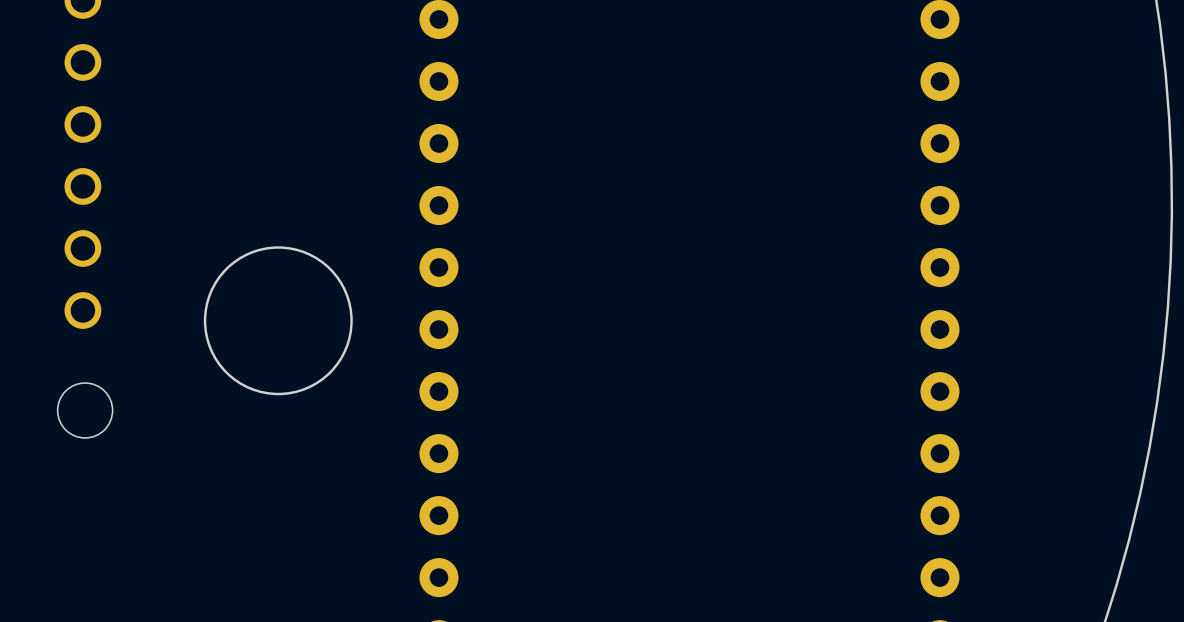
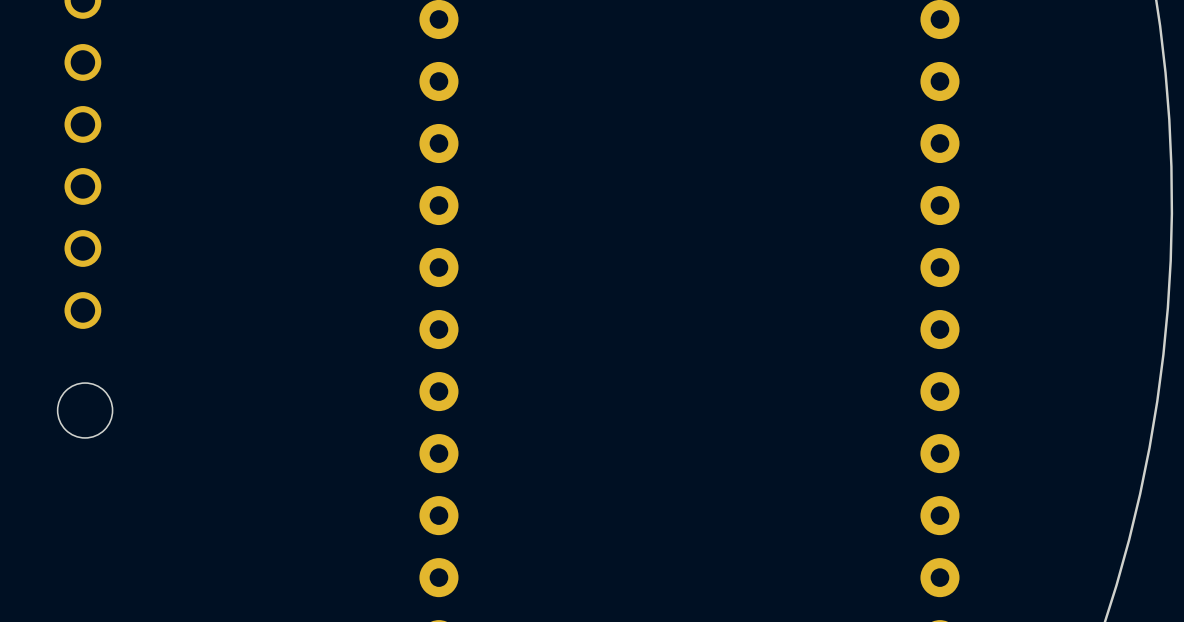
round board edge: [203, 246, 353, 396] -> none

